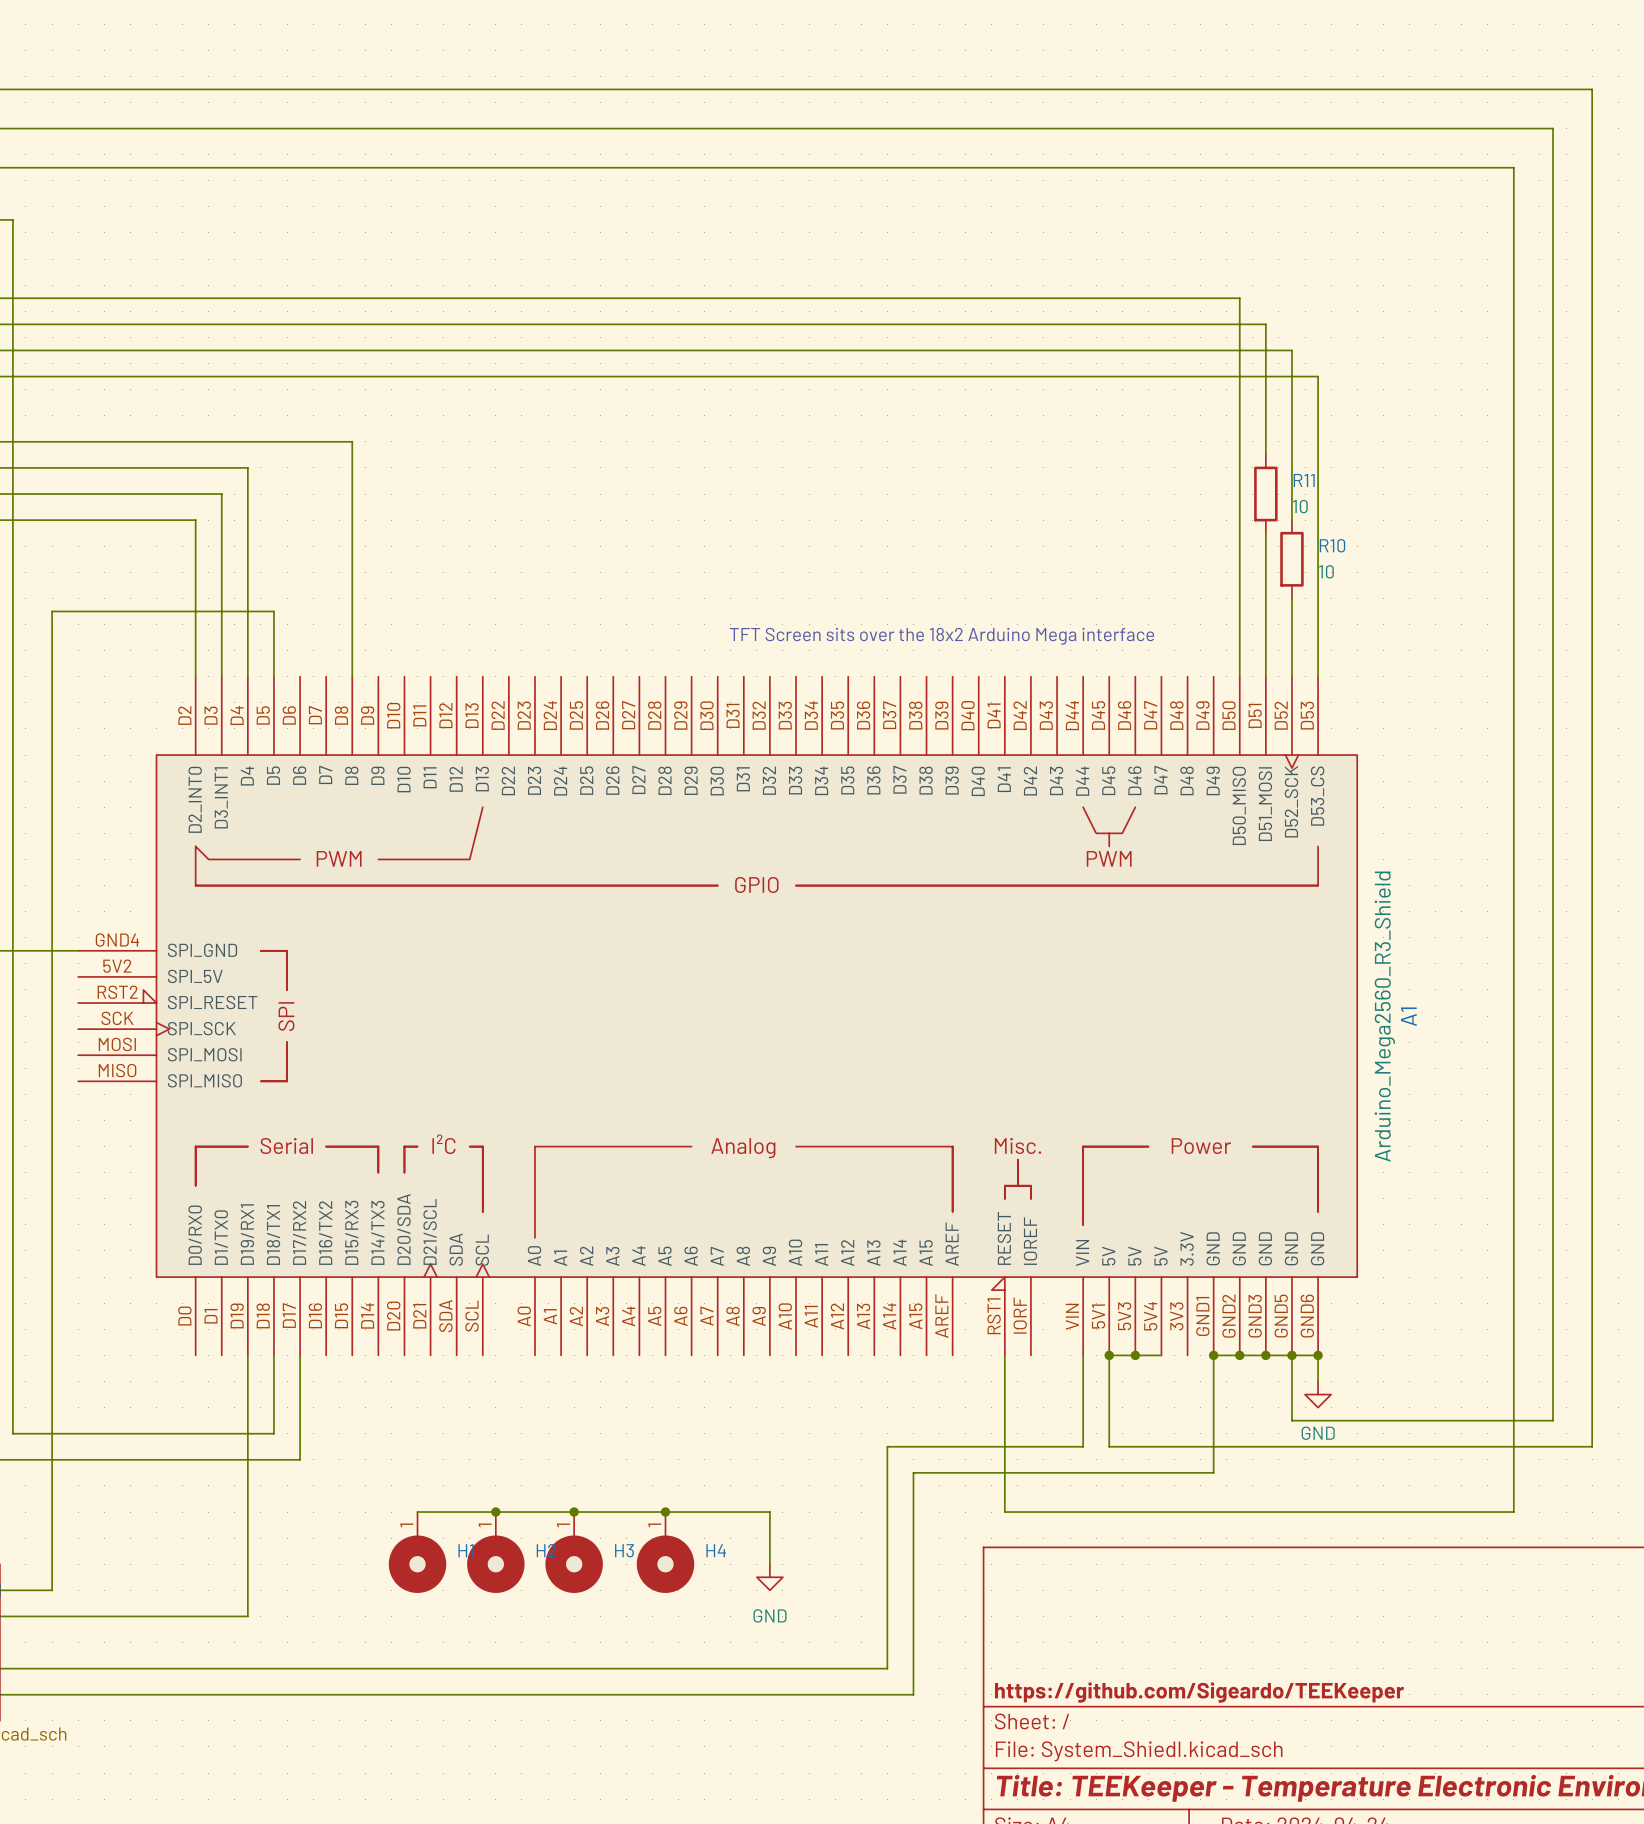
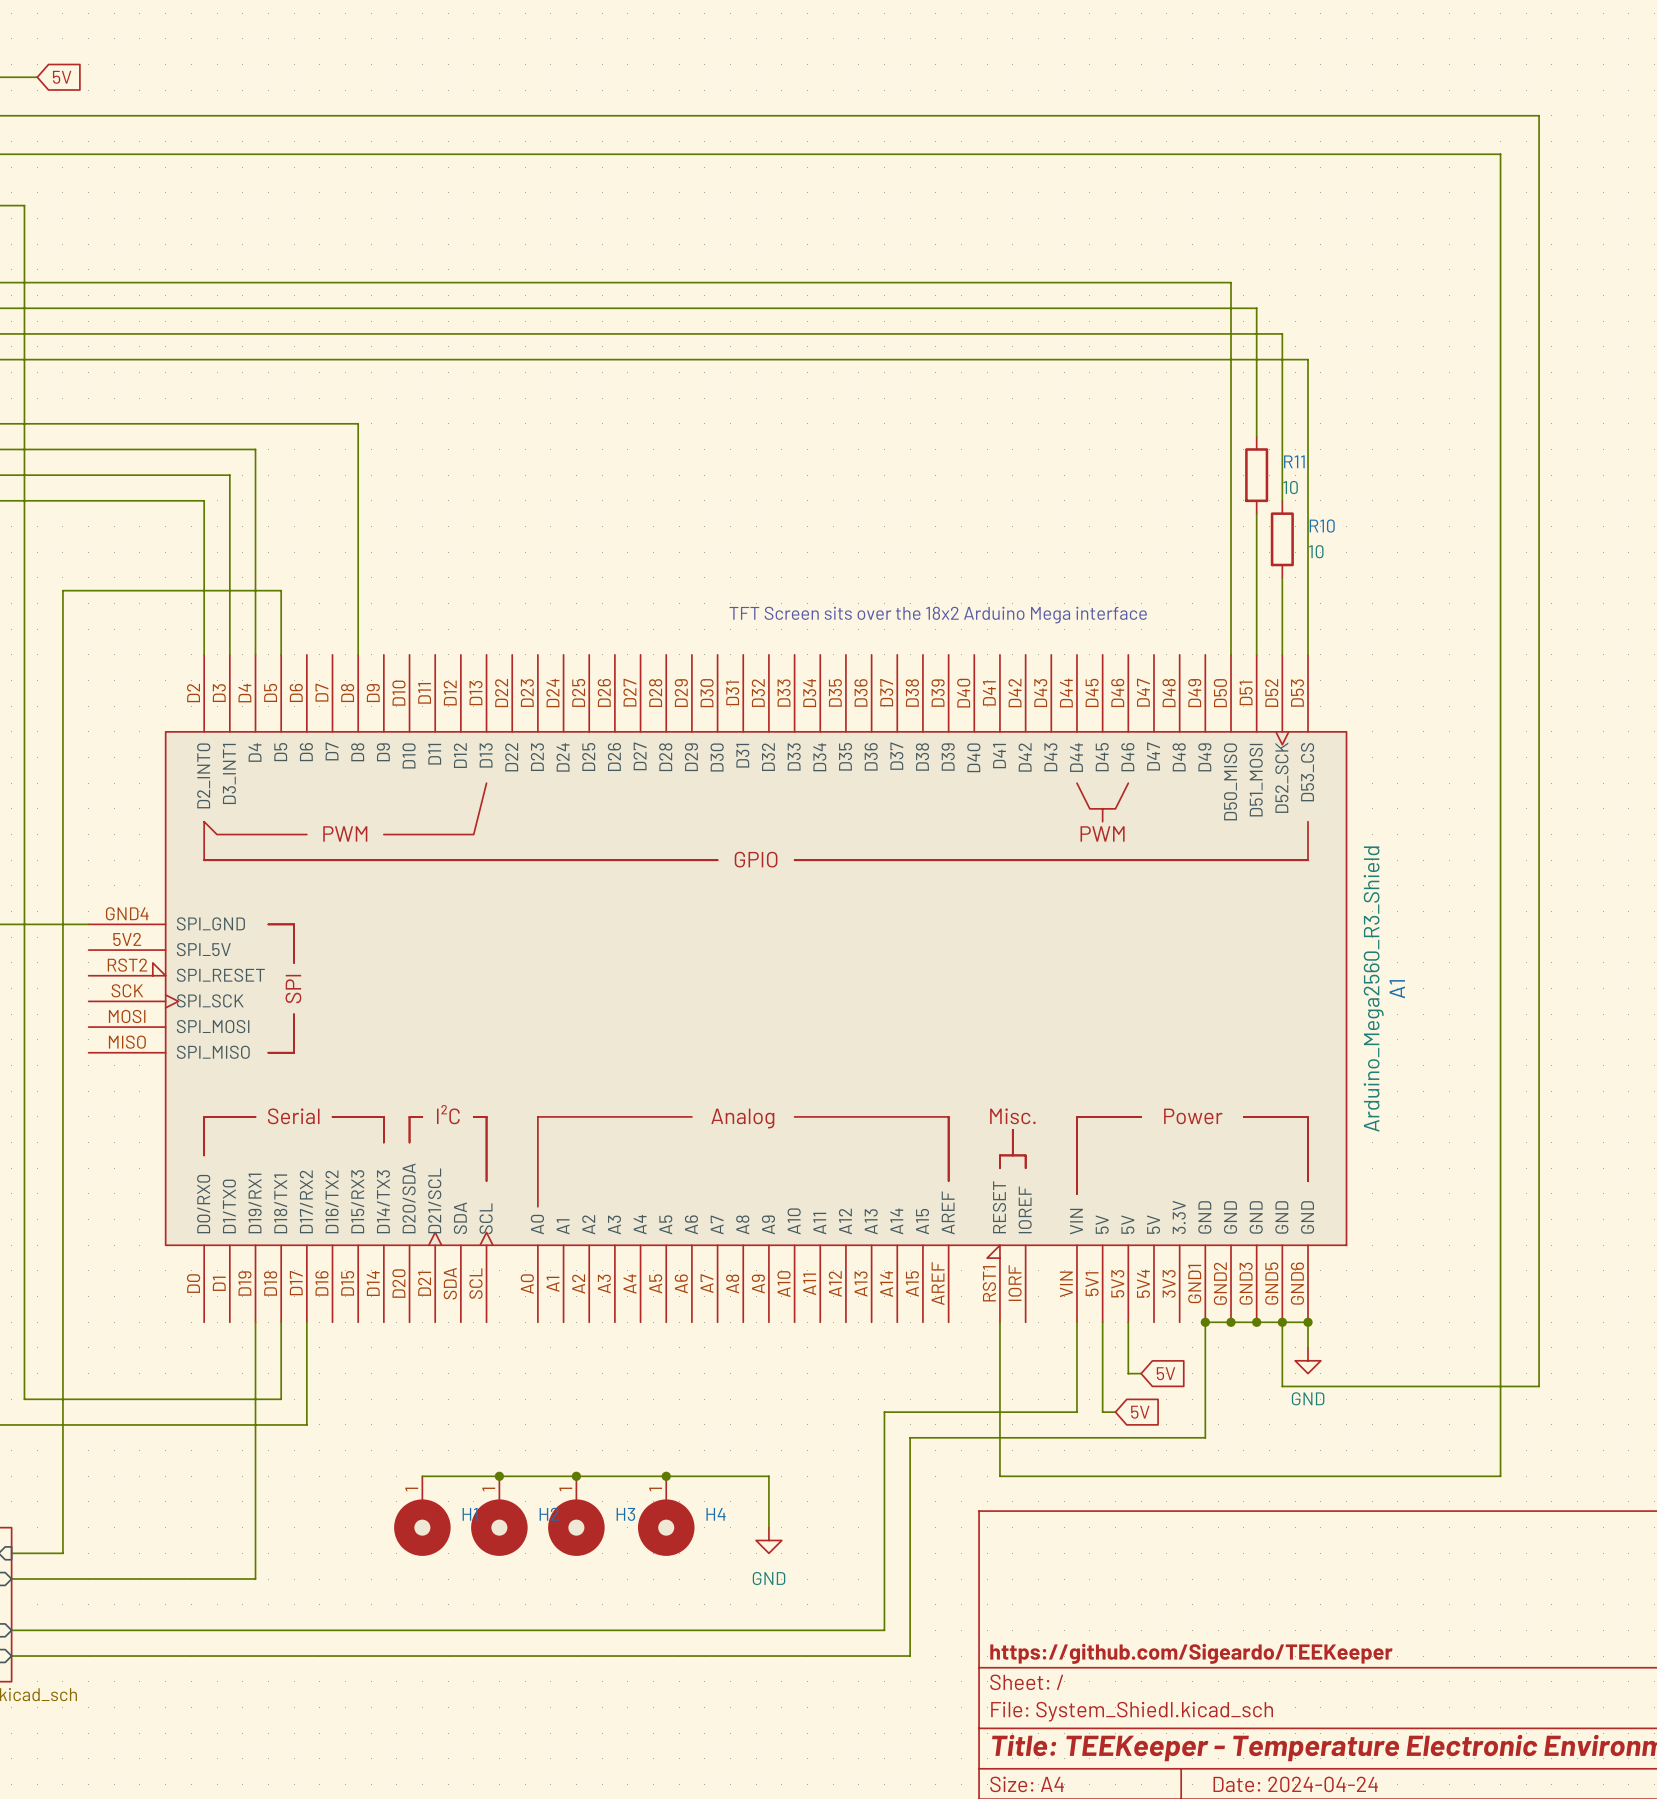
wire: (25, 89) (1592, 89) (1592, 1446) (1122, 1446) -> none
global label: none -> 5V (62, 77)
wire: (1109, 1355) (1161, 1355) -> none
junction: (1109, 1355) -> none
wire: none -> (1128, 1322) (1128, 1373) (1141, 1373)
junction: (1135, 1355) -> none
global label: none -> 5V (1166, 1373)
global label: none -> 5V (1140, 1412)

